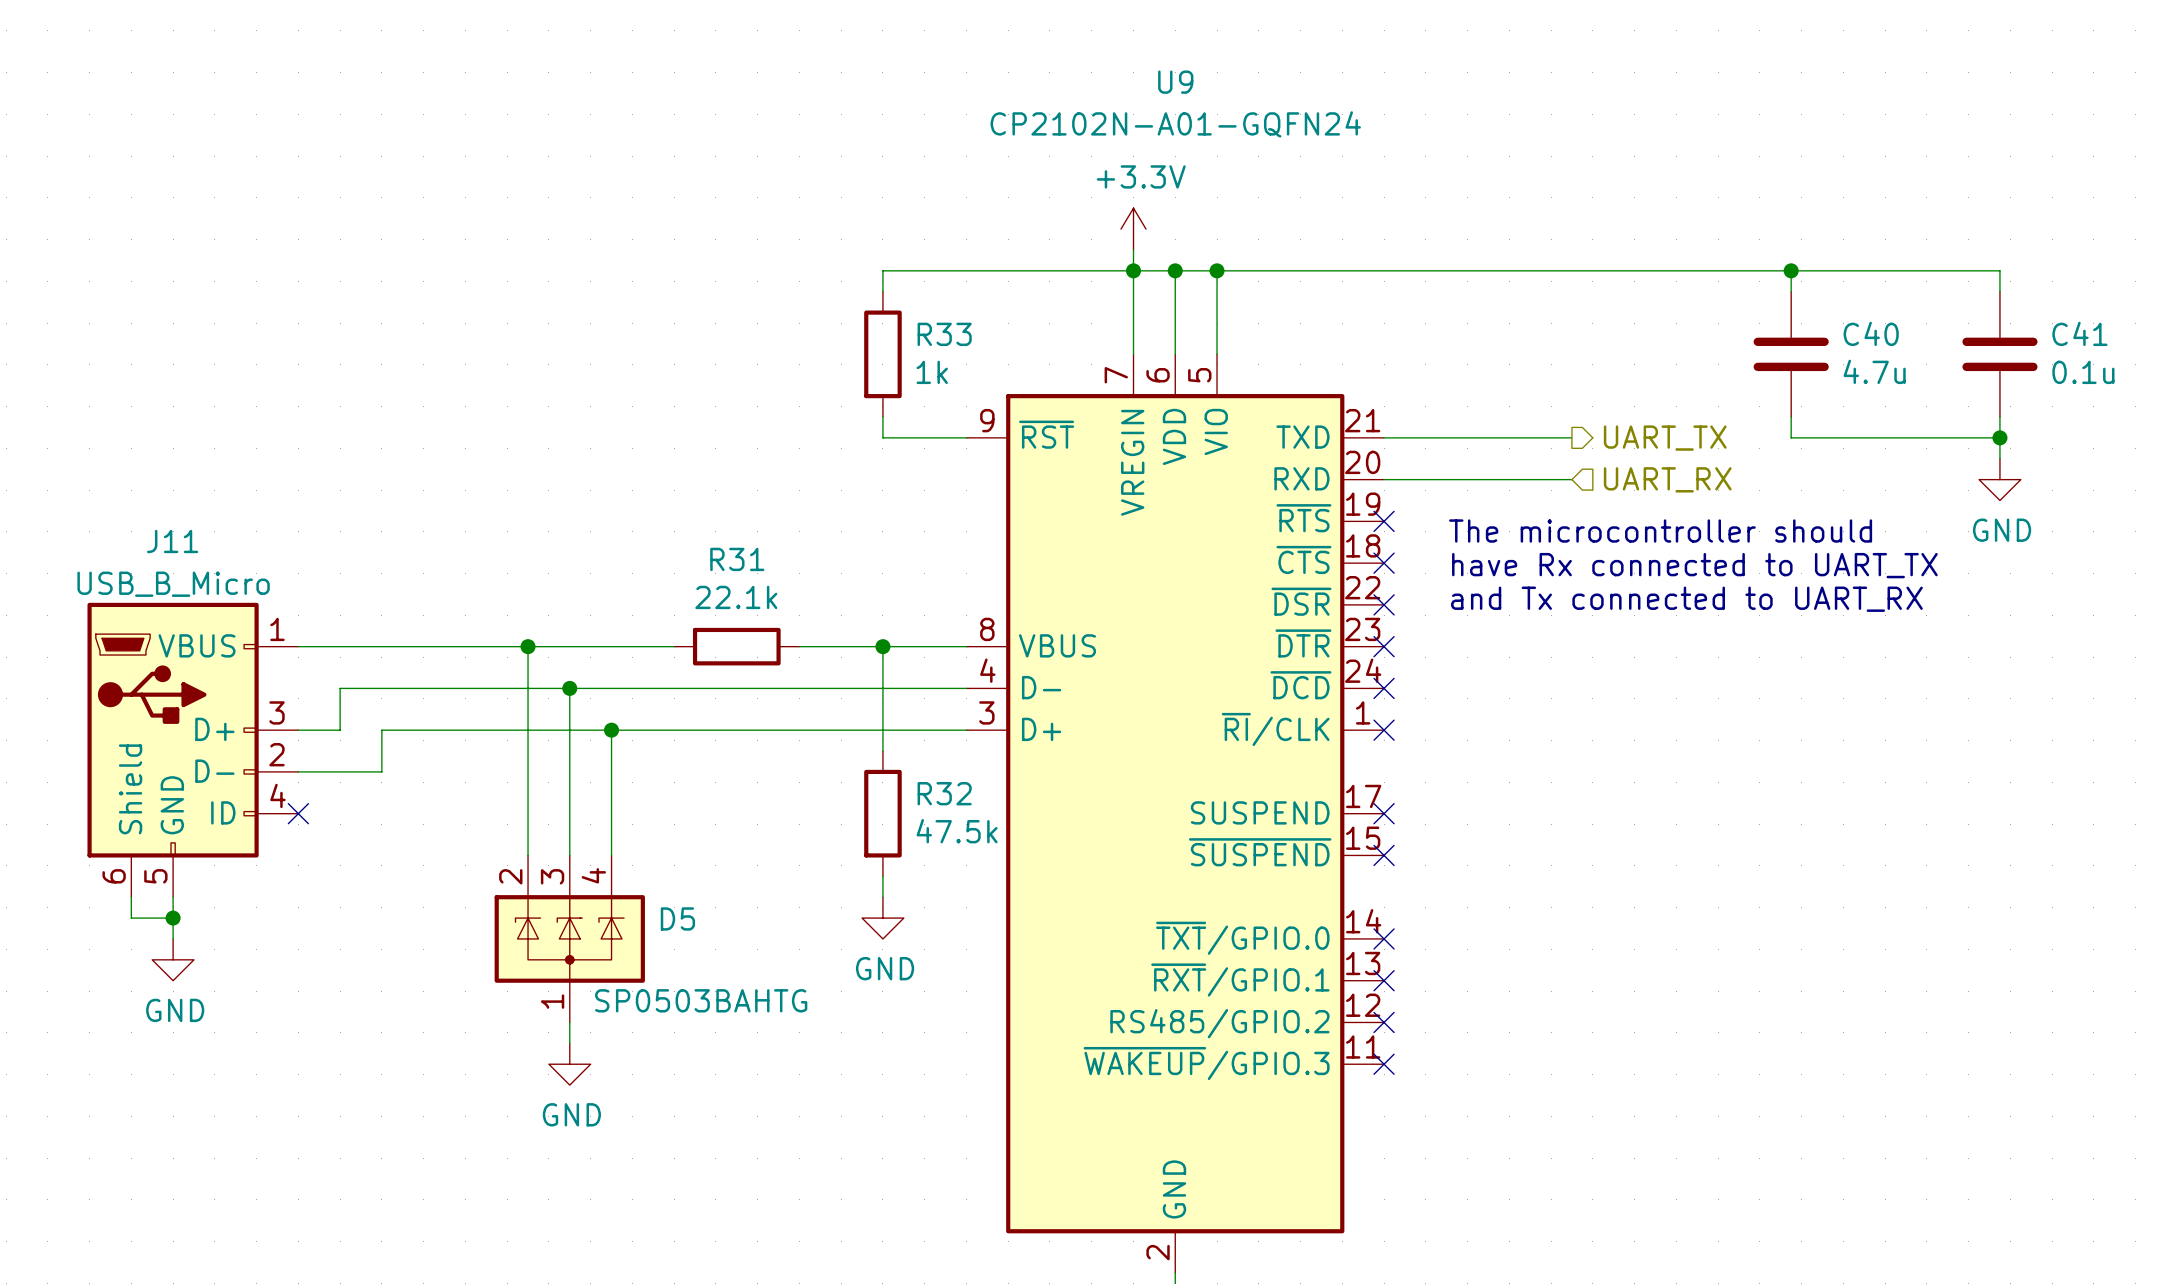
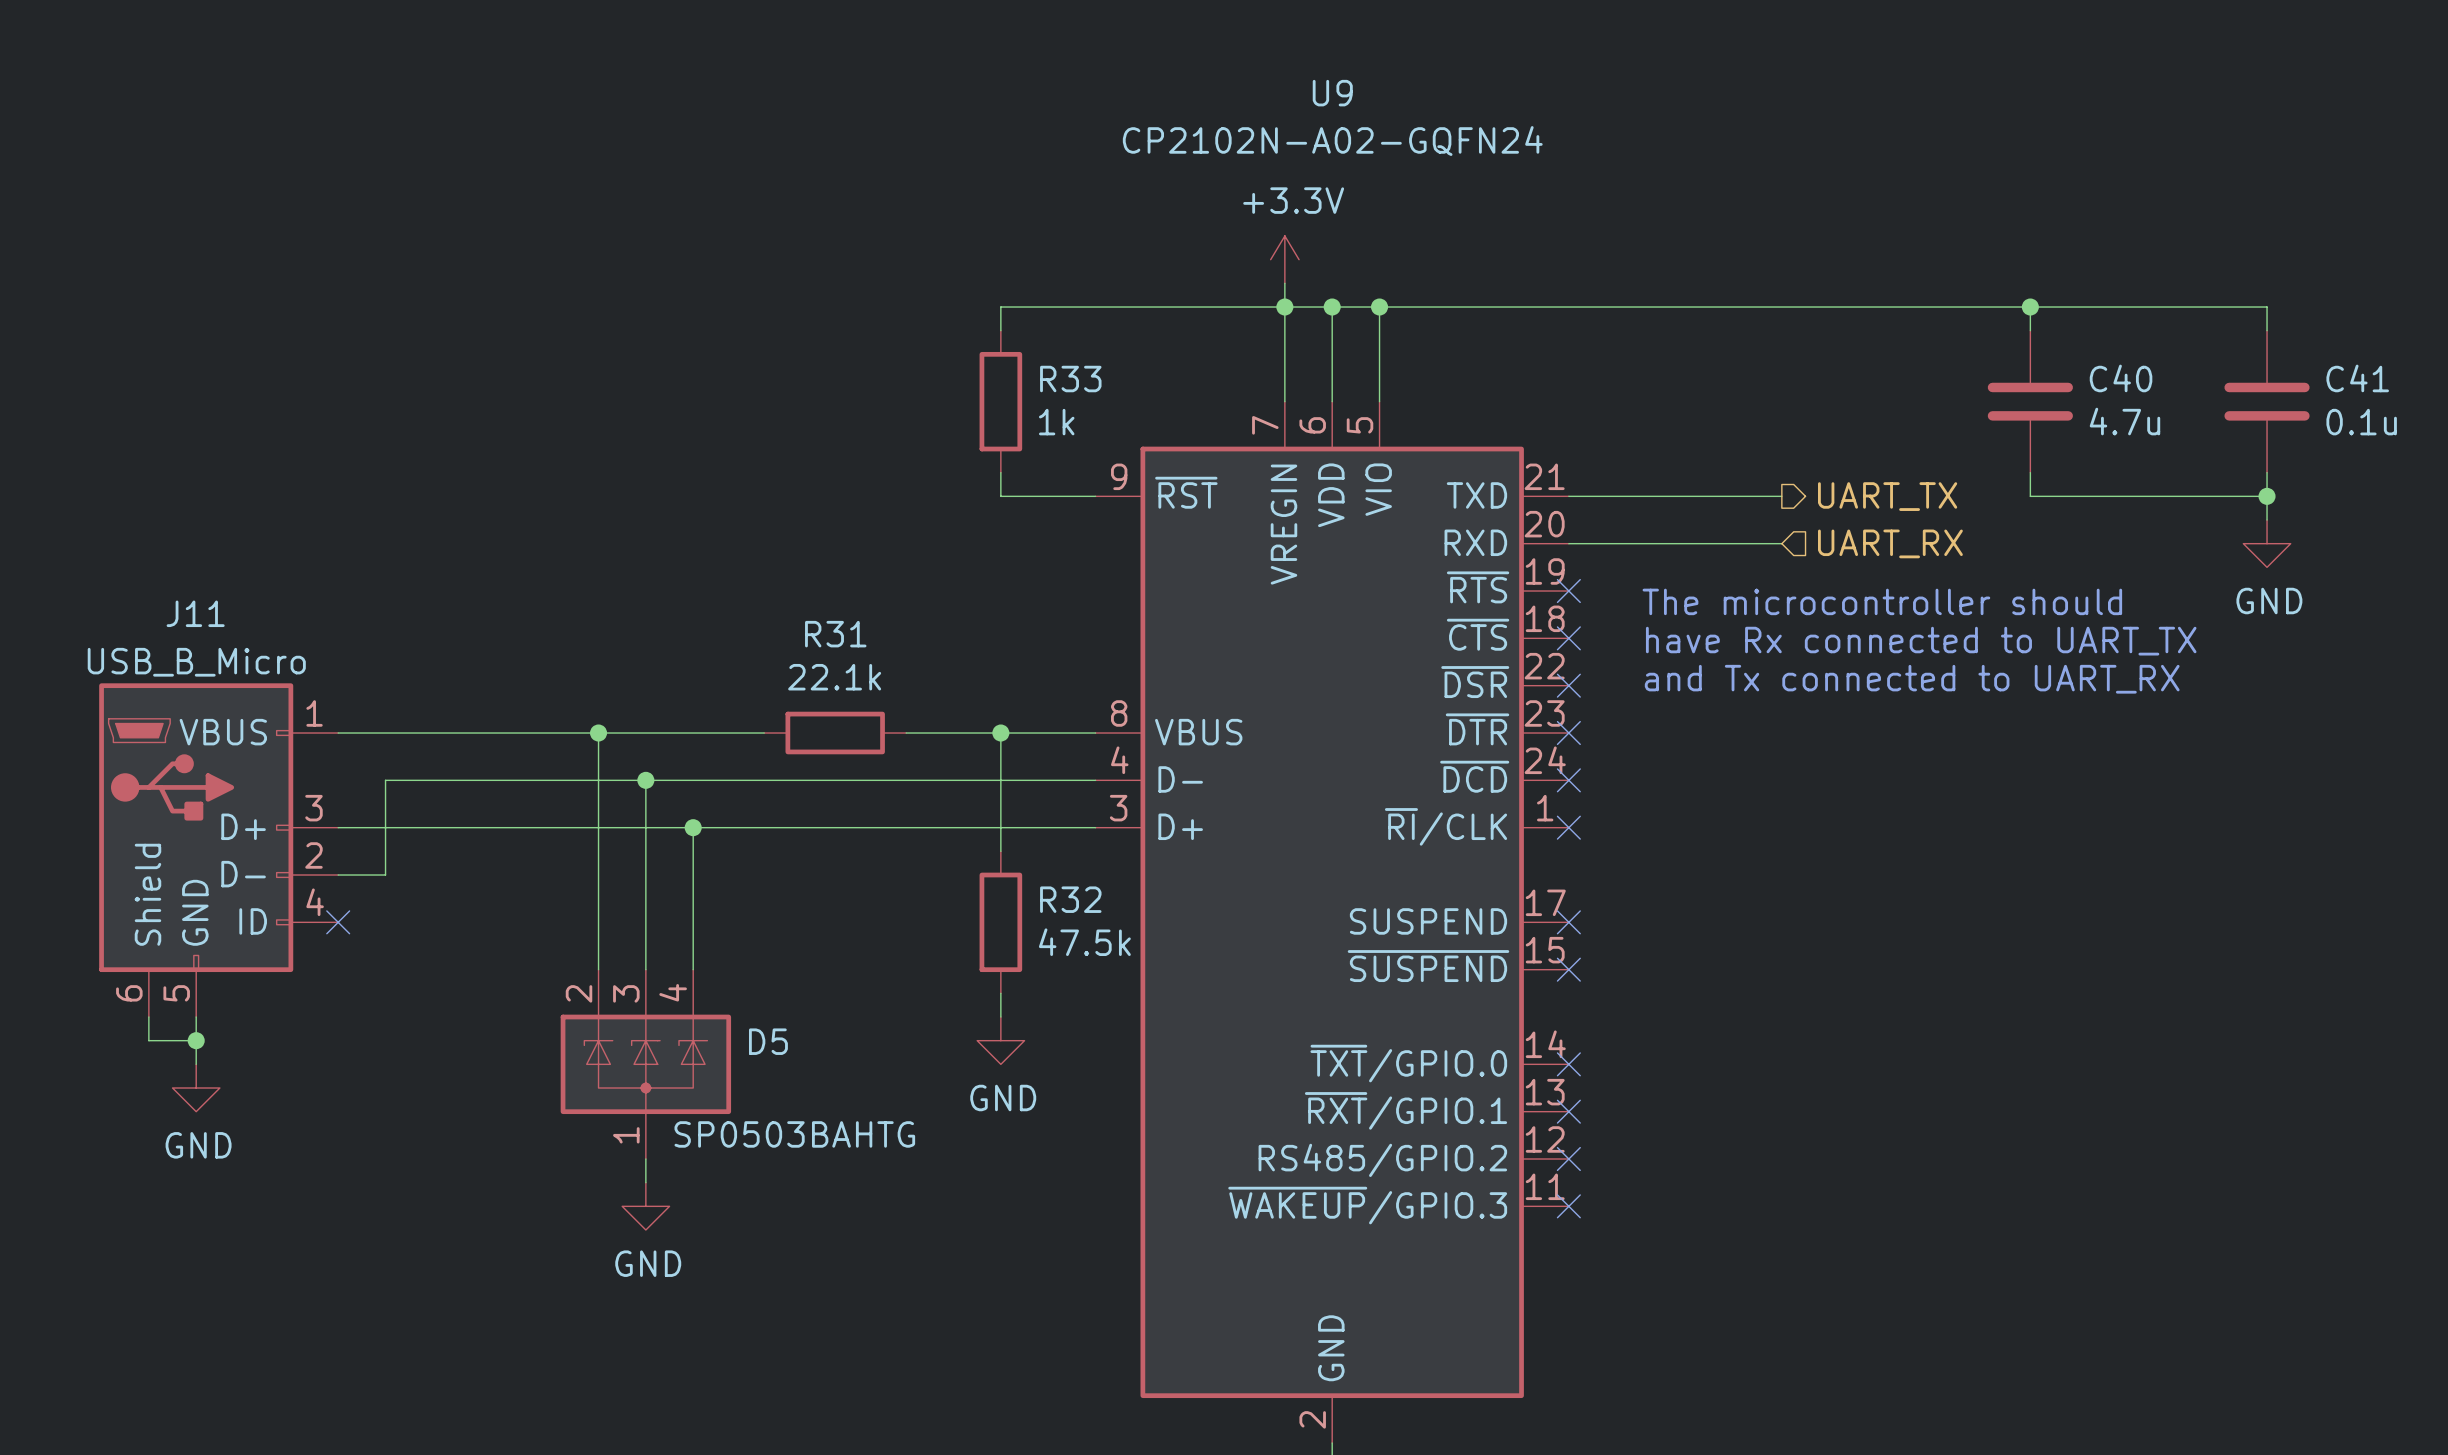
U9 value: CP2102N-A01-GQFN24 (1175, 124) -> CP2102N-A02-GQFN24 (1332, 141)
wire: (381, 730) (381, 771) (340, 771) -> (432, 827) (385, 827) (385, 875)

